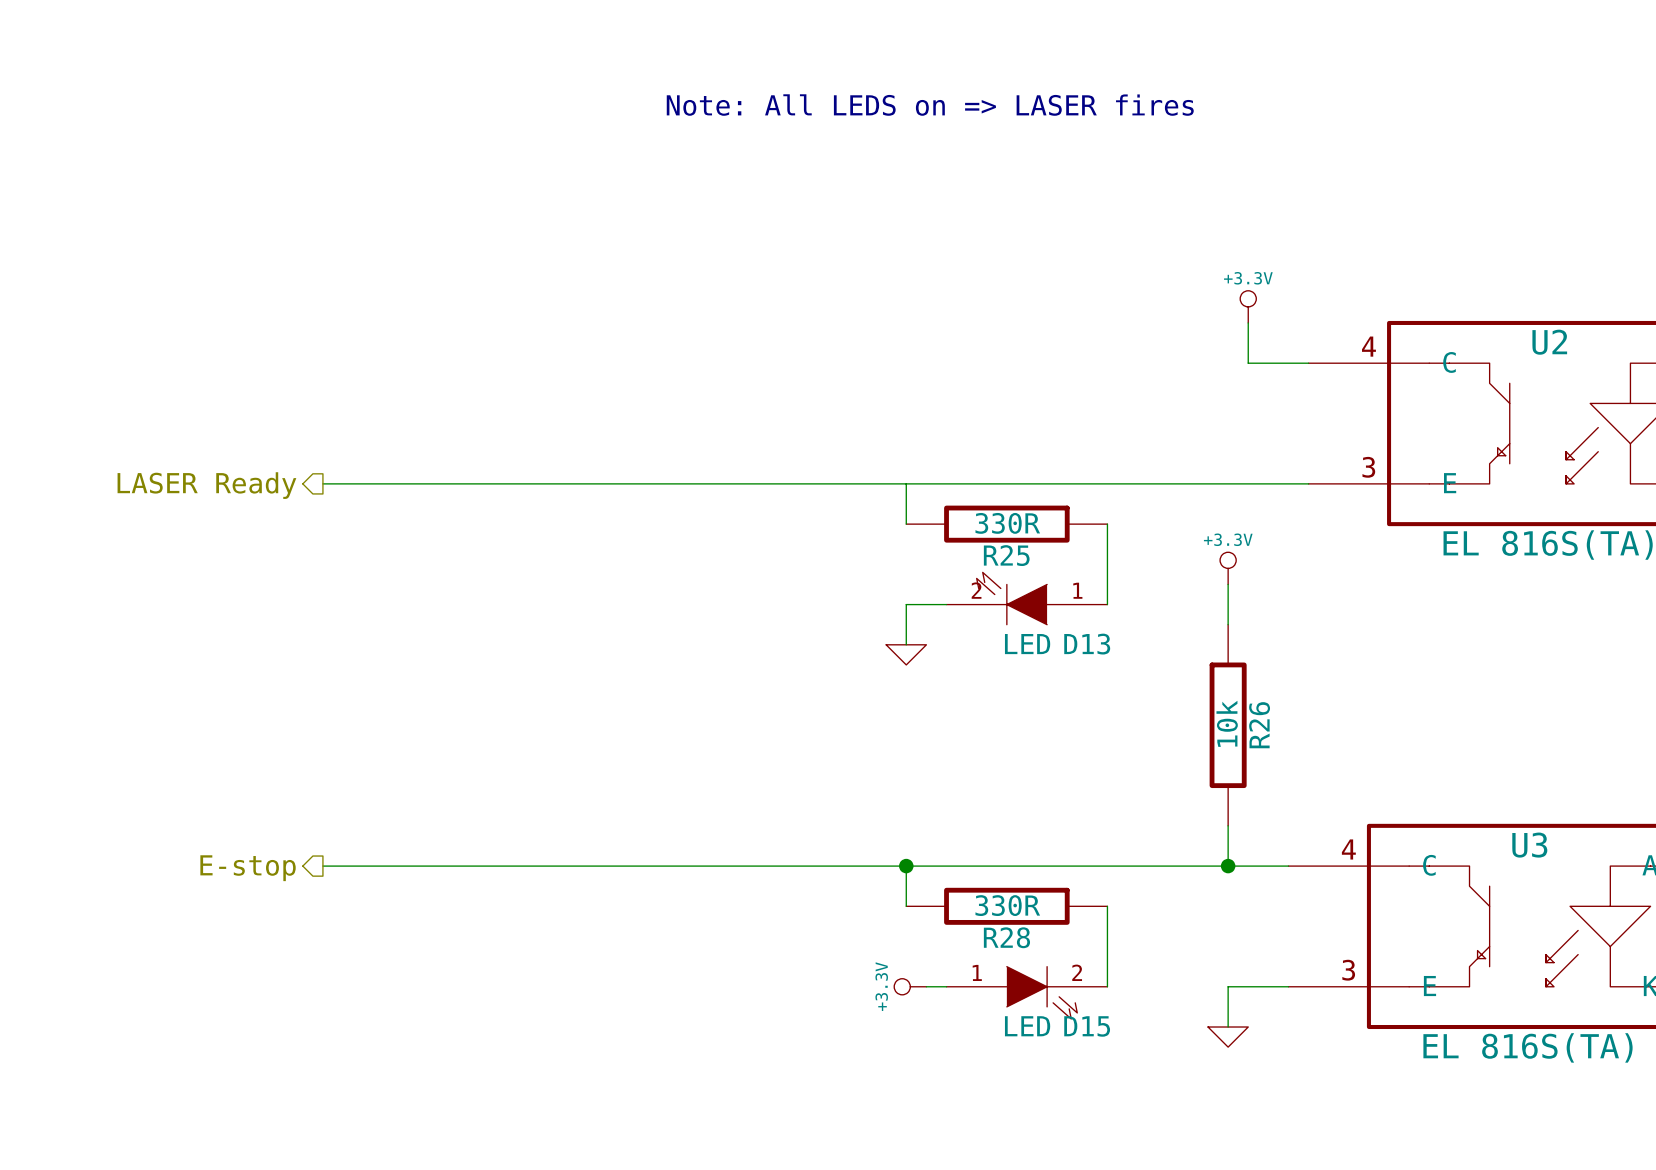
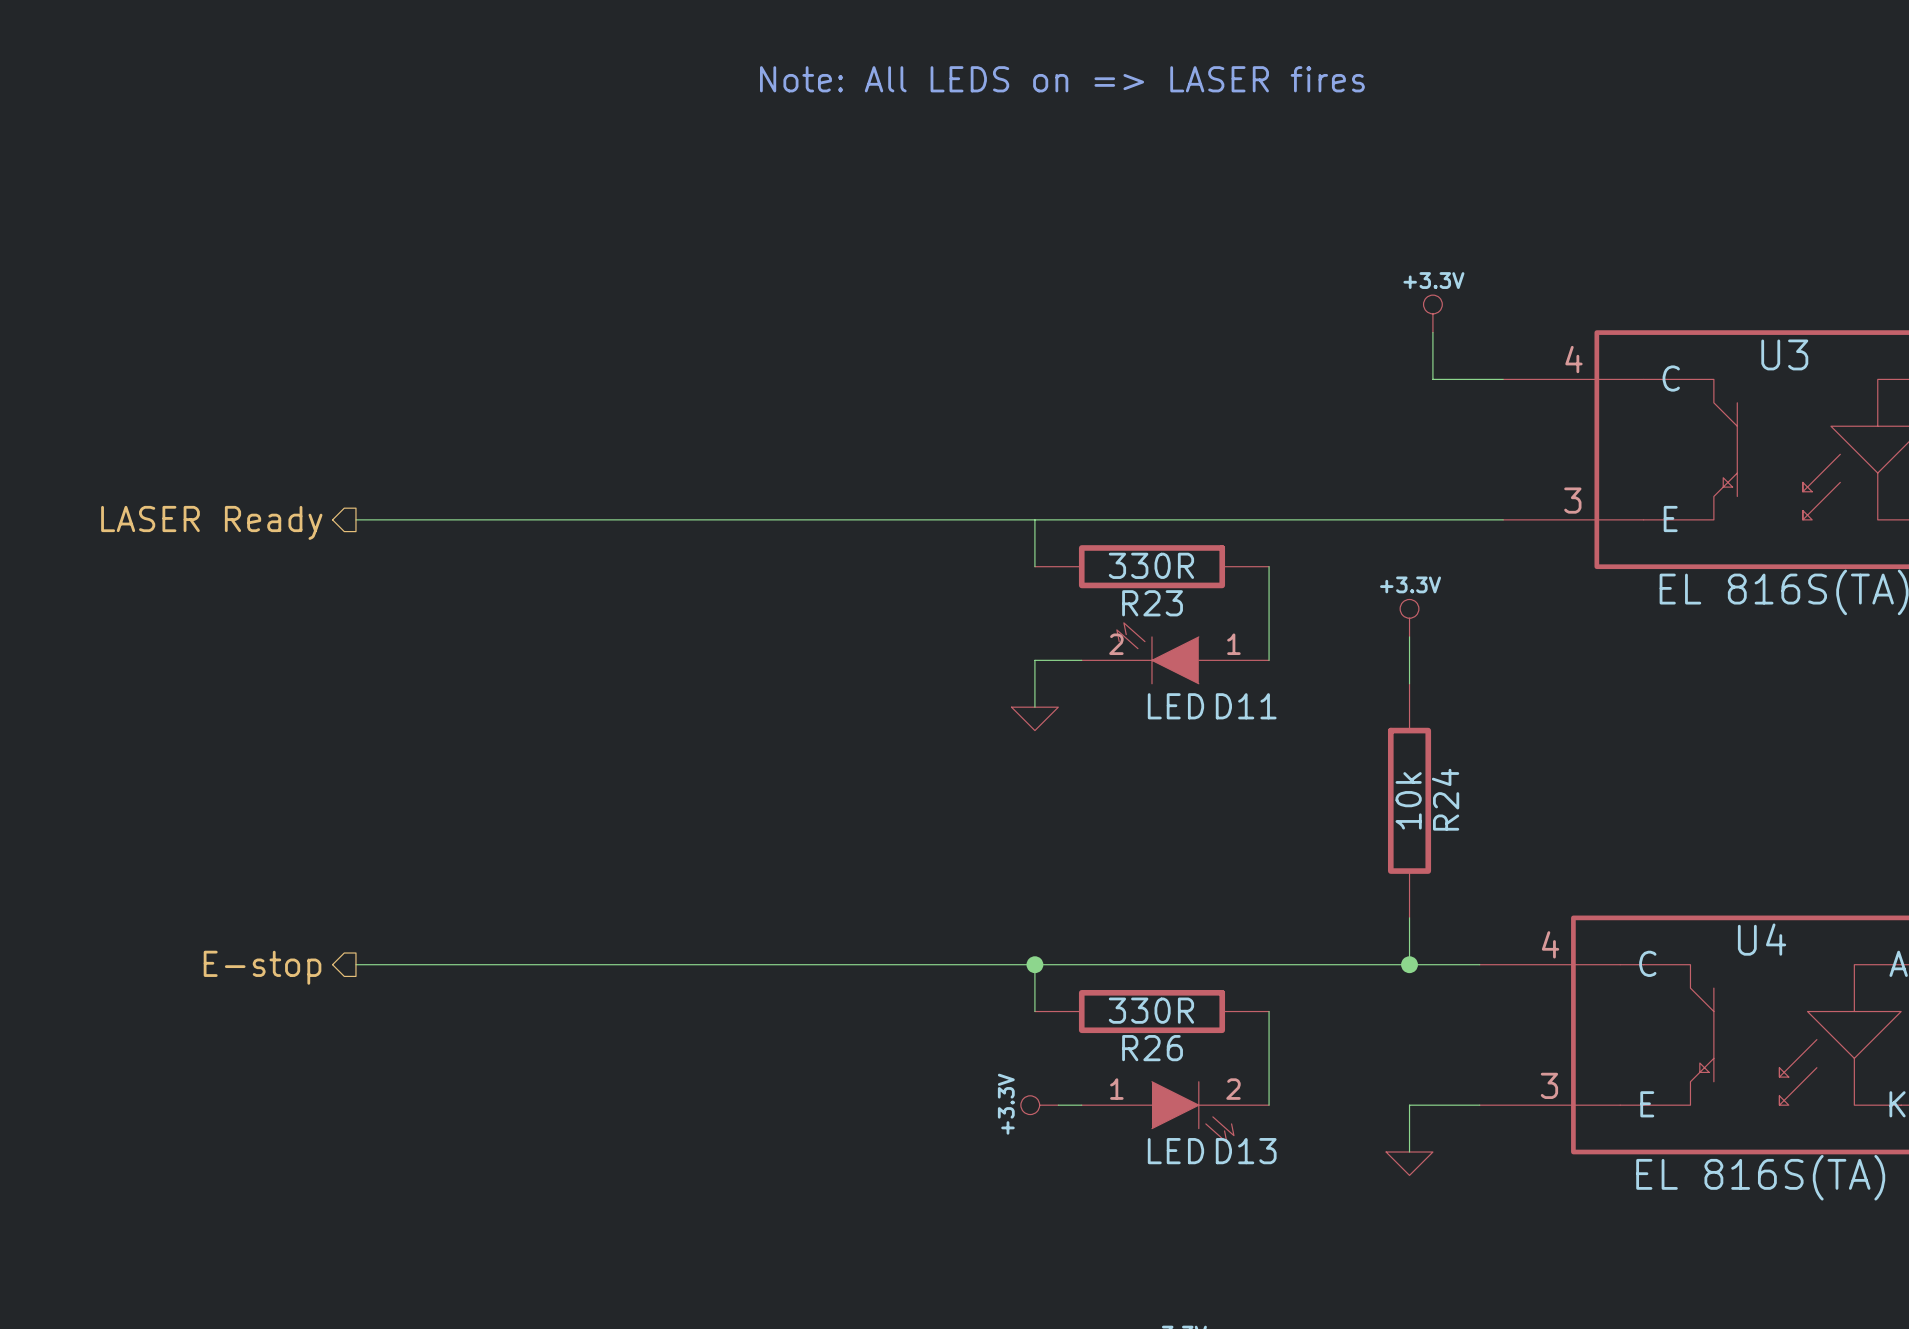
U2 name: U2 (1549, 342) -> U3 (1784, 354)
R25 name: R25 (1006, 555) -> R23 (1152, 603)
D13 name: D13 (1087, 644) -> D11 (1246, 706)
R26 name: R26 (1259, 725) -> R24 (1445, 799)
U3 name: U3 (1529, 845) -> U4 (1762, 939)
R28 name: R28 (1006, 937) -> R26 (1152, 1048)
D15 name: D15 (1087, 1026) -> D13 (1246, 1151)

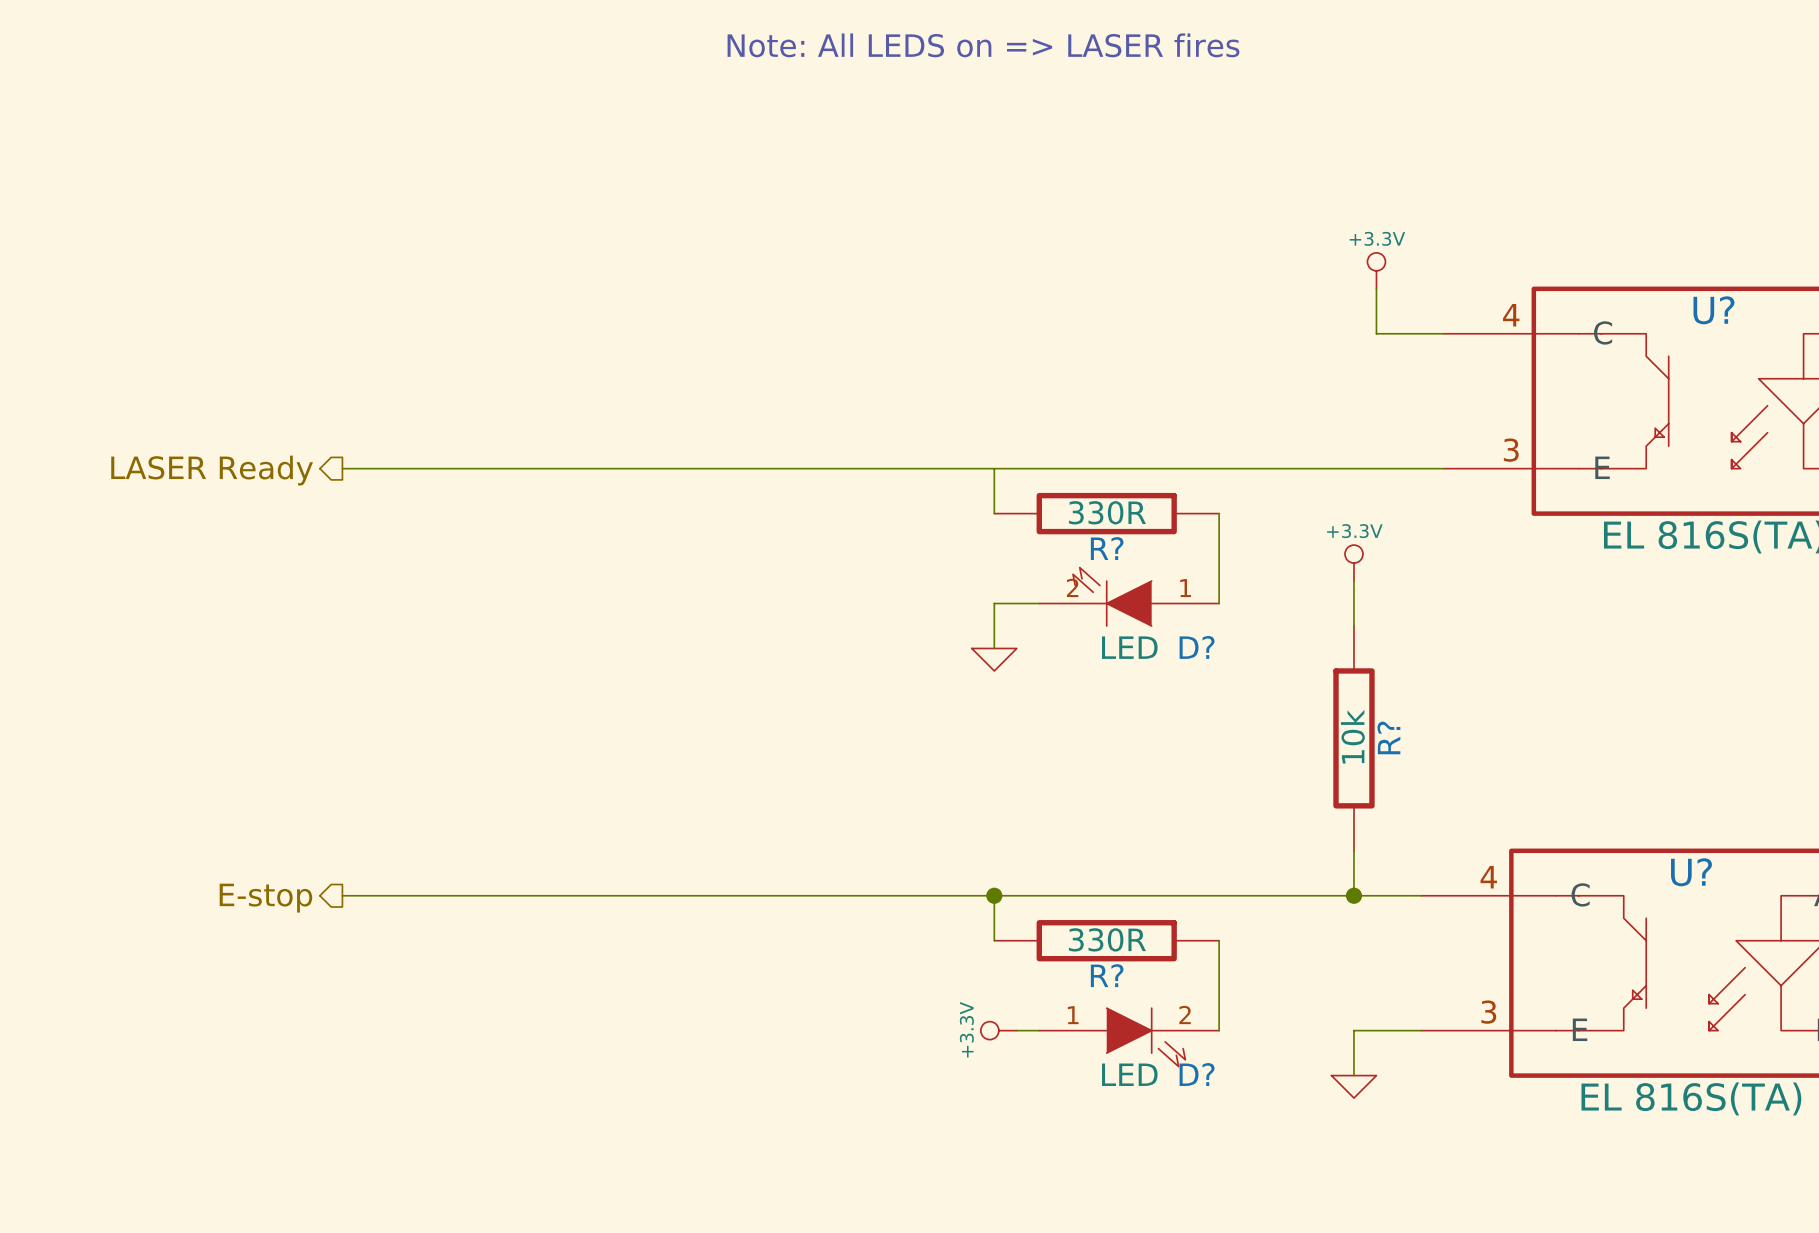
U3 name: U3 (1784, 354) -> U? (1713, 310)
R23 name: R23 (1152, 603) -> R? (1107, 548)
D11 name: D11 (1246, 706) -> D? (1197, 647)
R24 name: R24 (1445, 799) -> R? (1388, 737)
U4 name: U4 (1762, 939) -> U? (1691, 872)
R26 name: R26 (1152, 1048) -> R? (1107, 975)
D13 name: D13 (1246, 1151) -> D? (1197, 1074)

